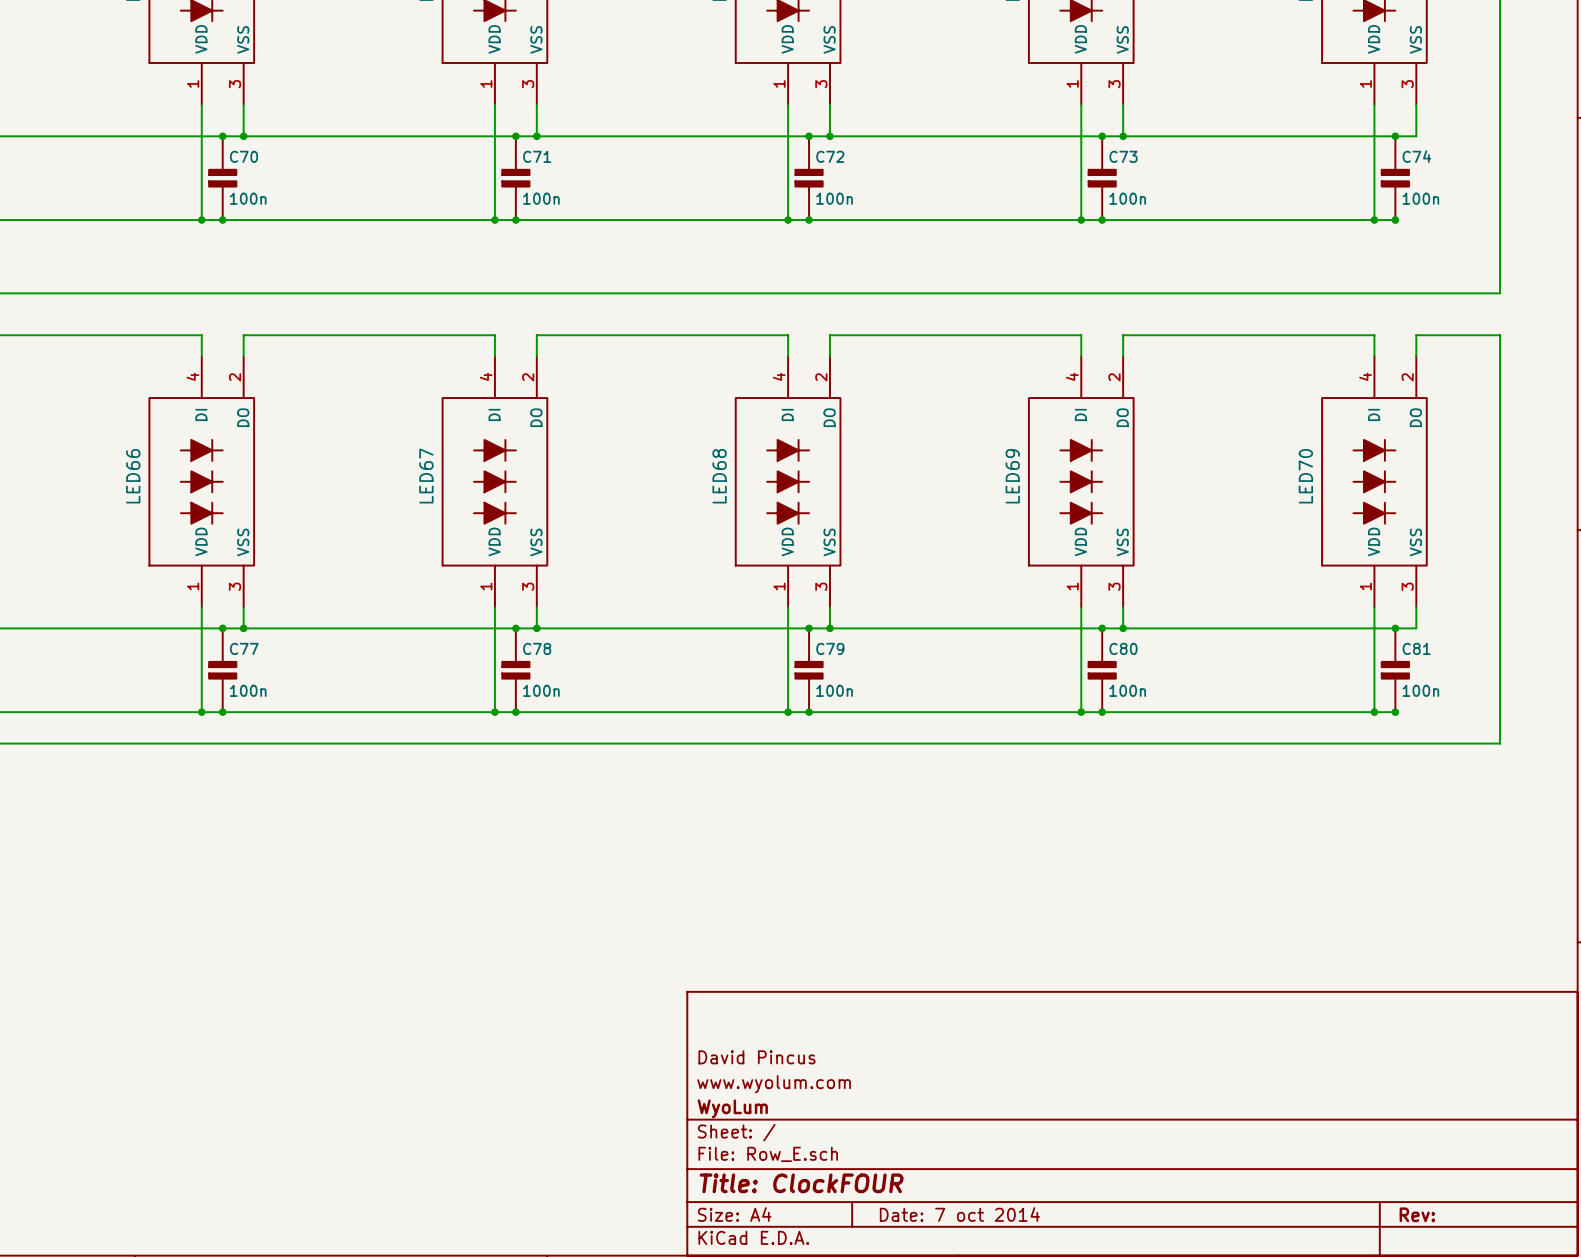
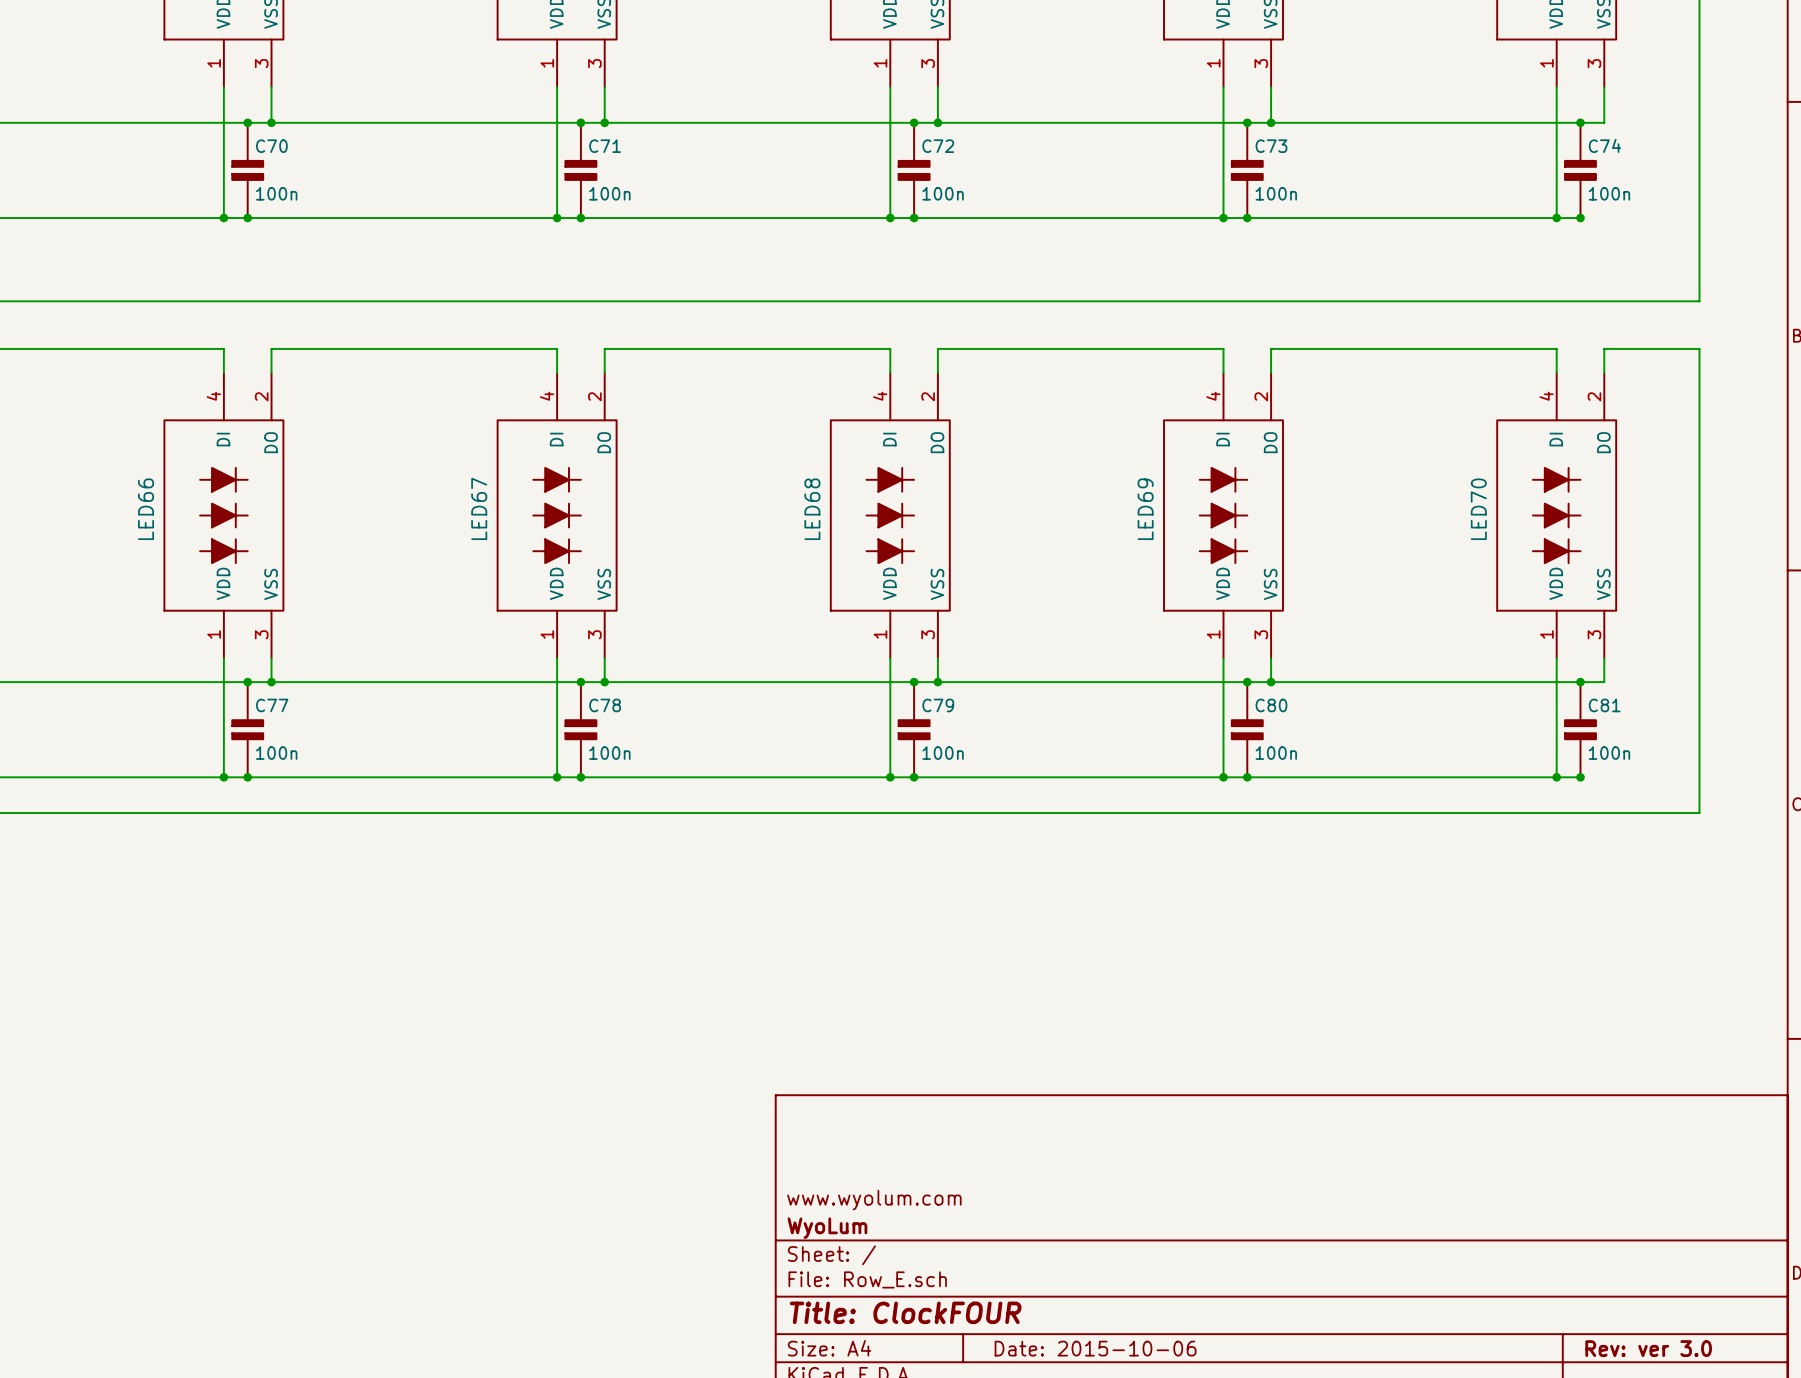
title block: David Pincus (757, 1057) -> none
title block: Date: 7 oct 2014 (959, 1214) -> Date: 2015-10-06 (1095, 1348)
title block: Rev: (1417, 1214) -> Rev: ver 3.0 (1648, 1348)

